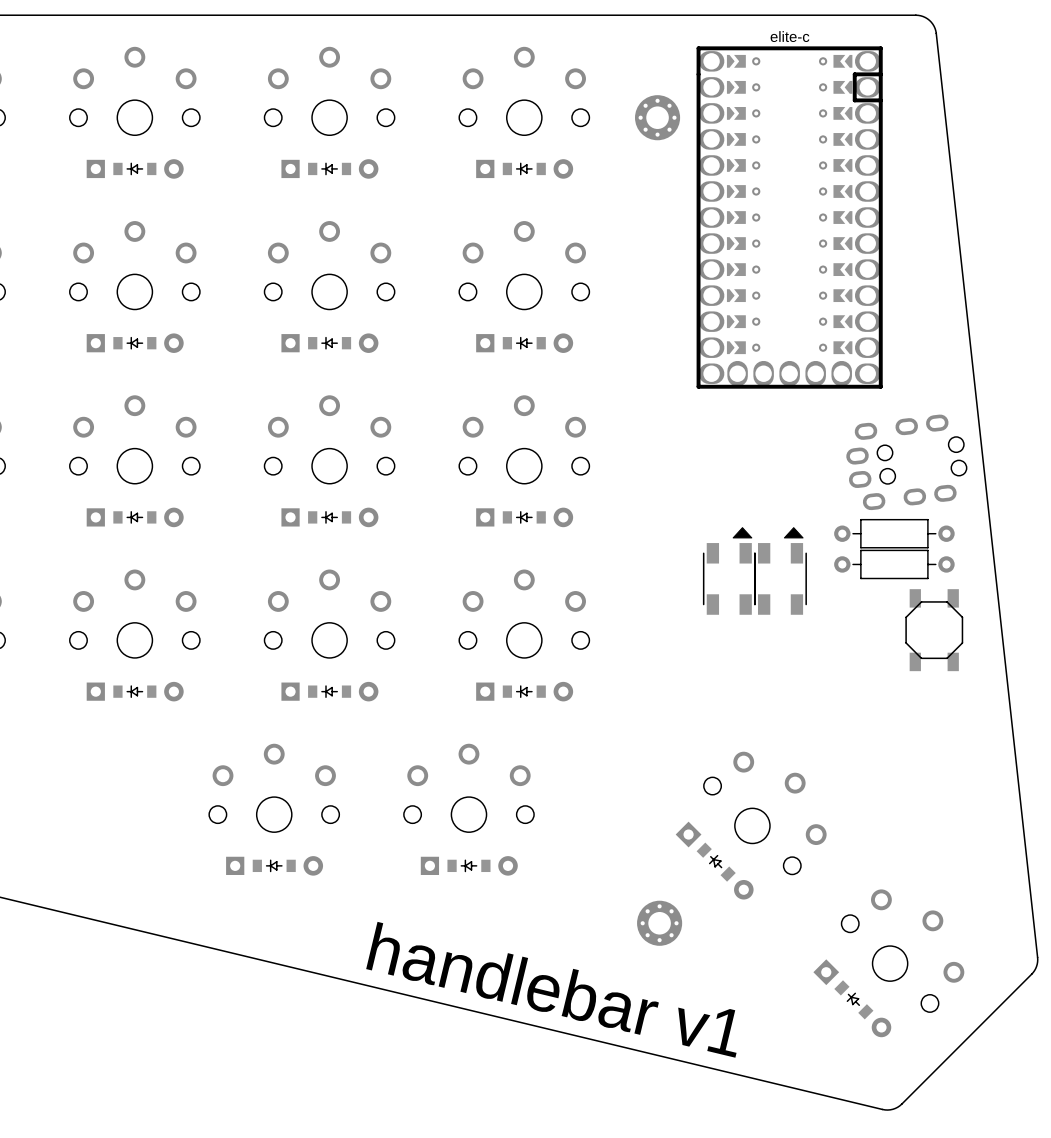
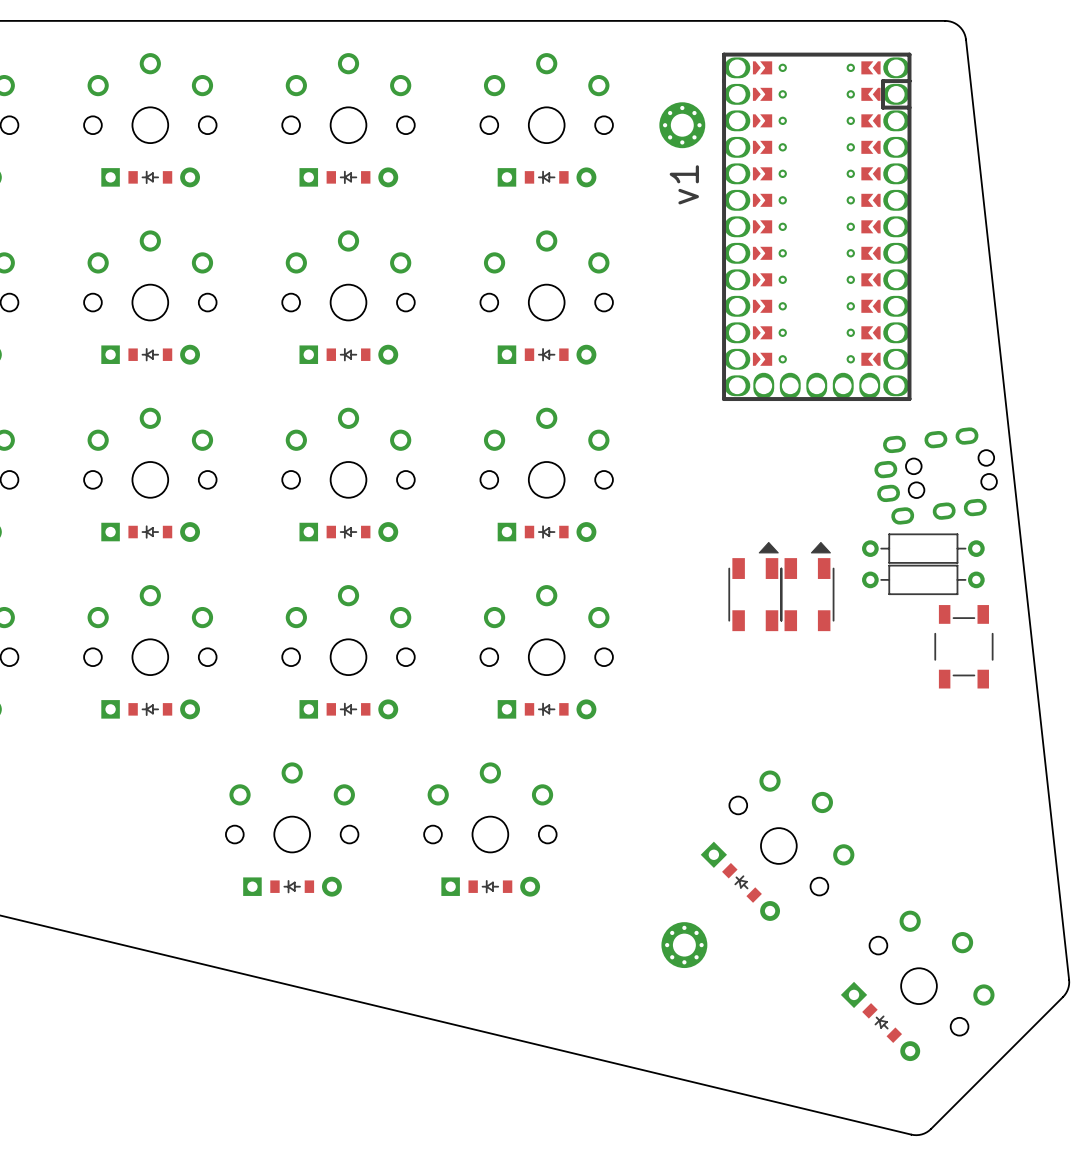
part text: elite-c (789, 36) -> none
text: none -> v1 (684, 184)
part footprint: [905, 589, 964, 672] -> [934, 605, 994, 689]
text: handlebar v1 (551, 989) -> none

